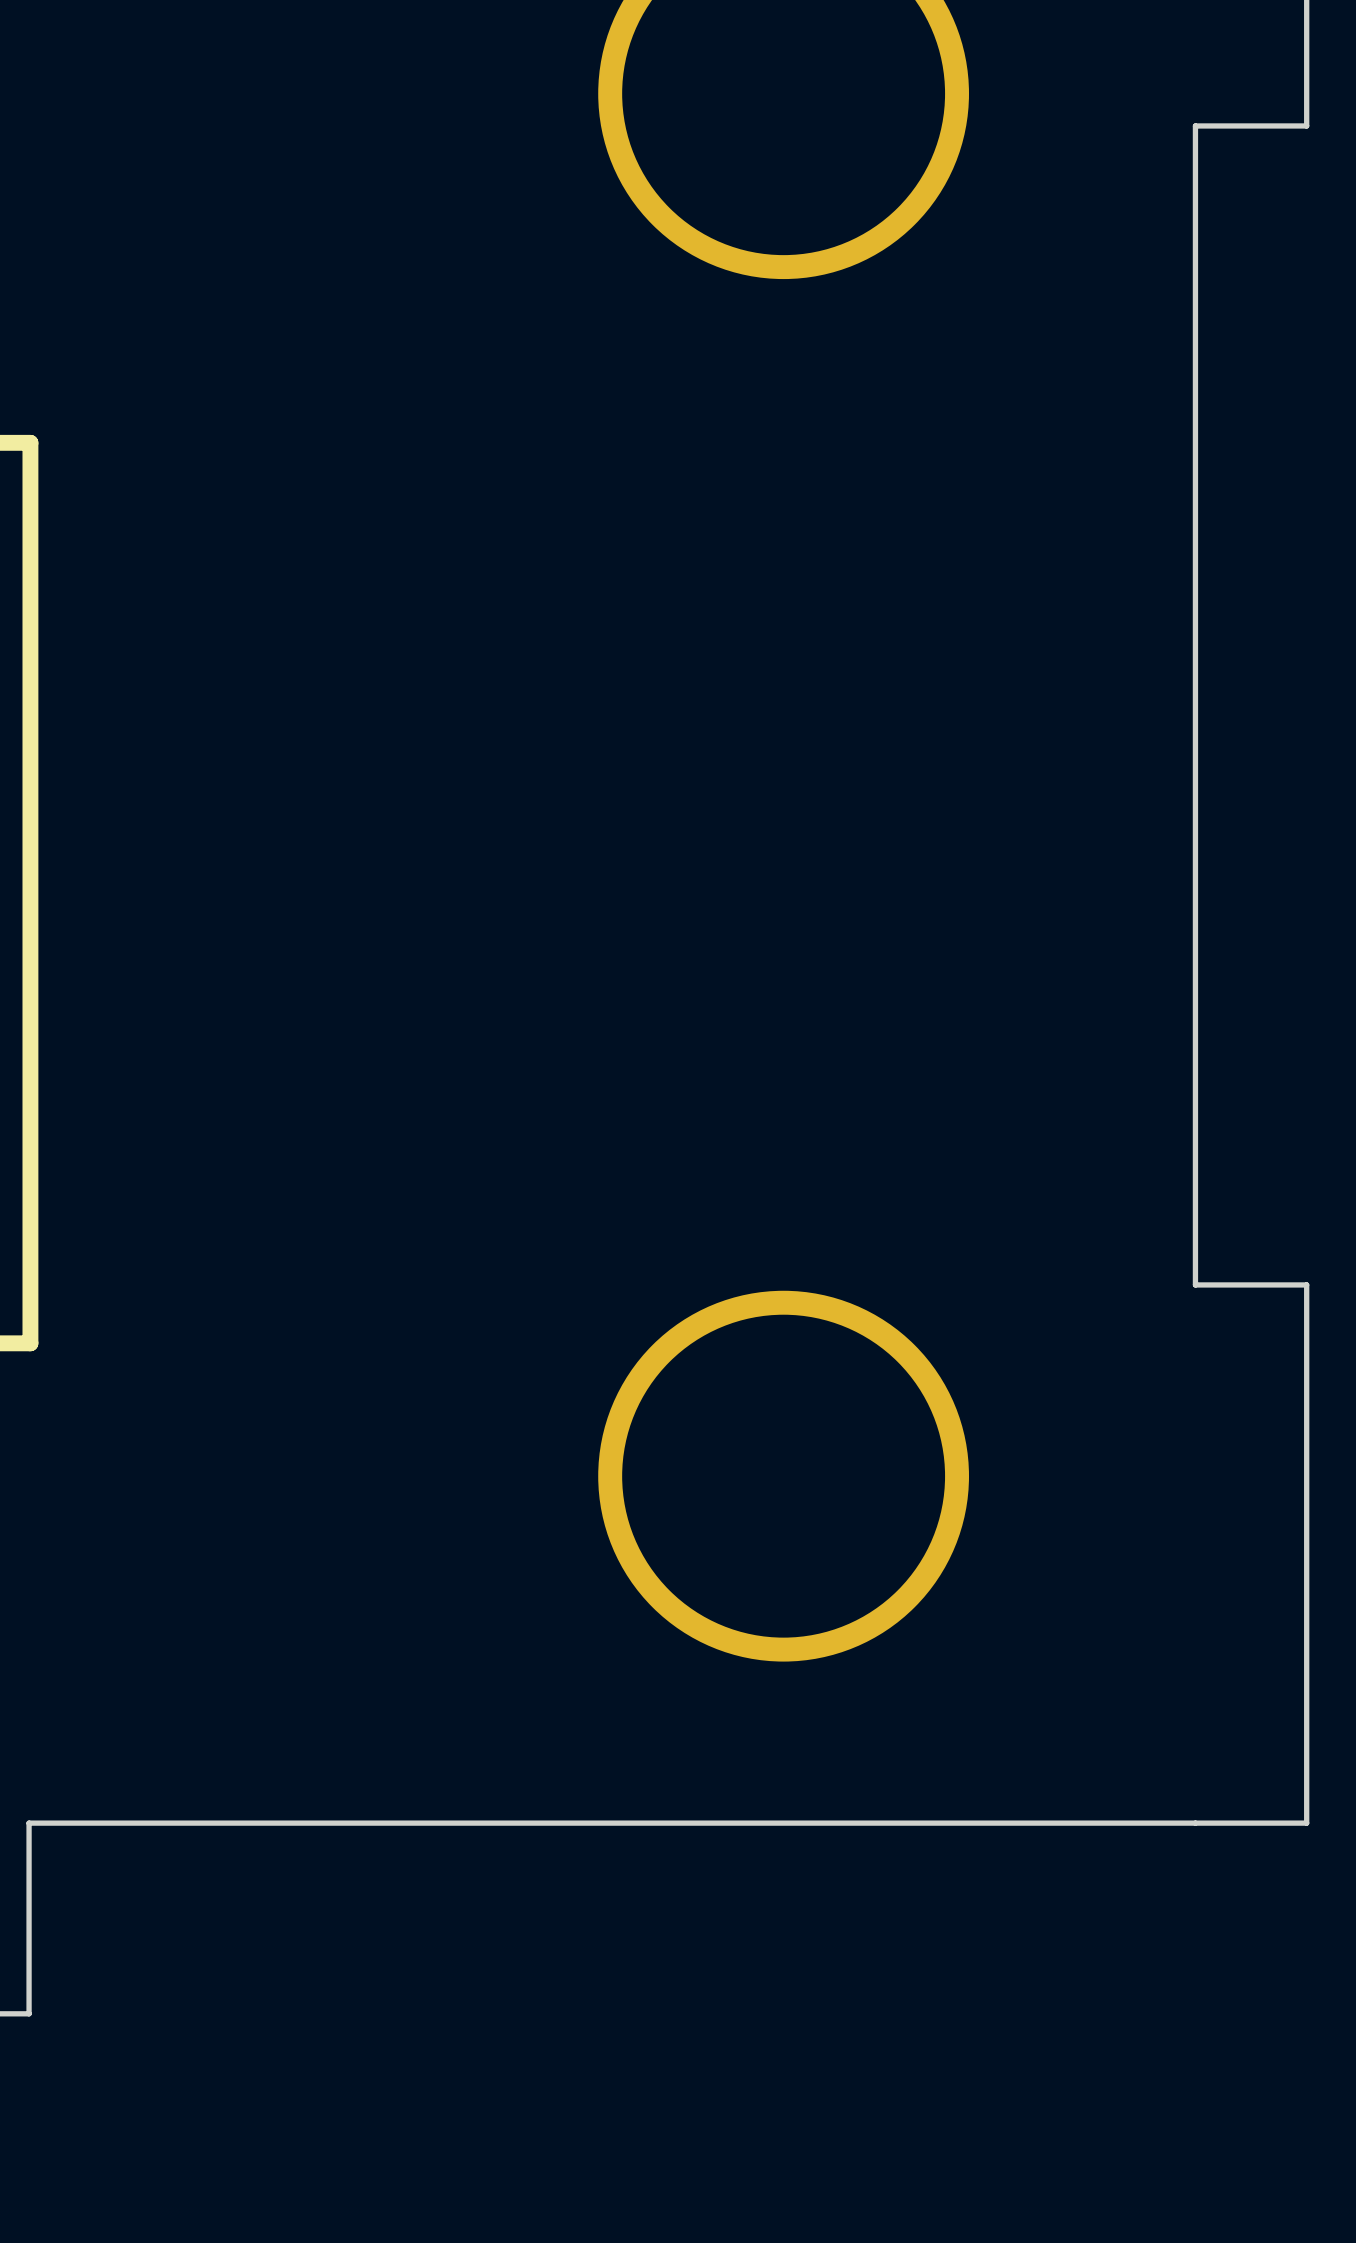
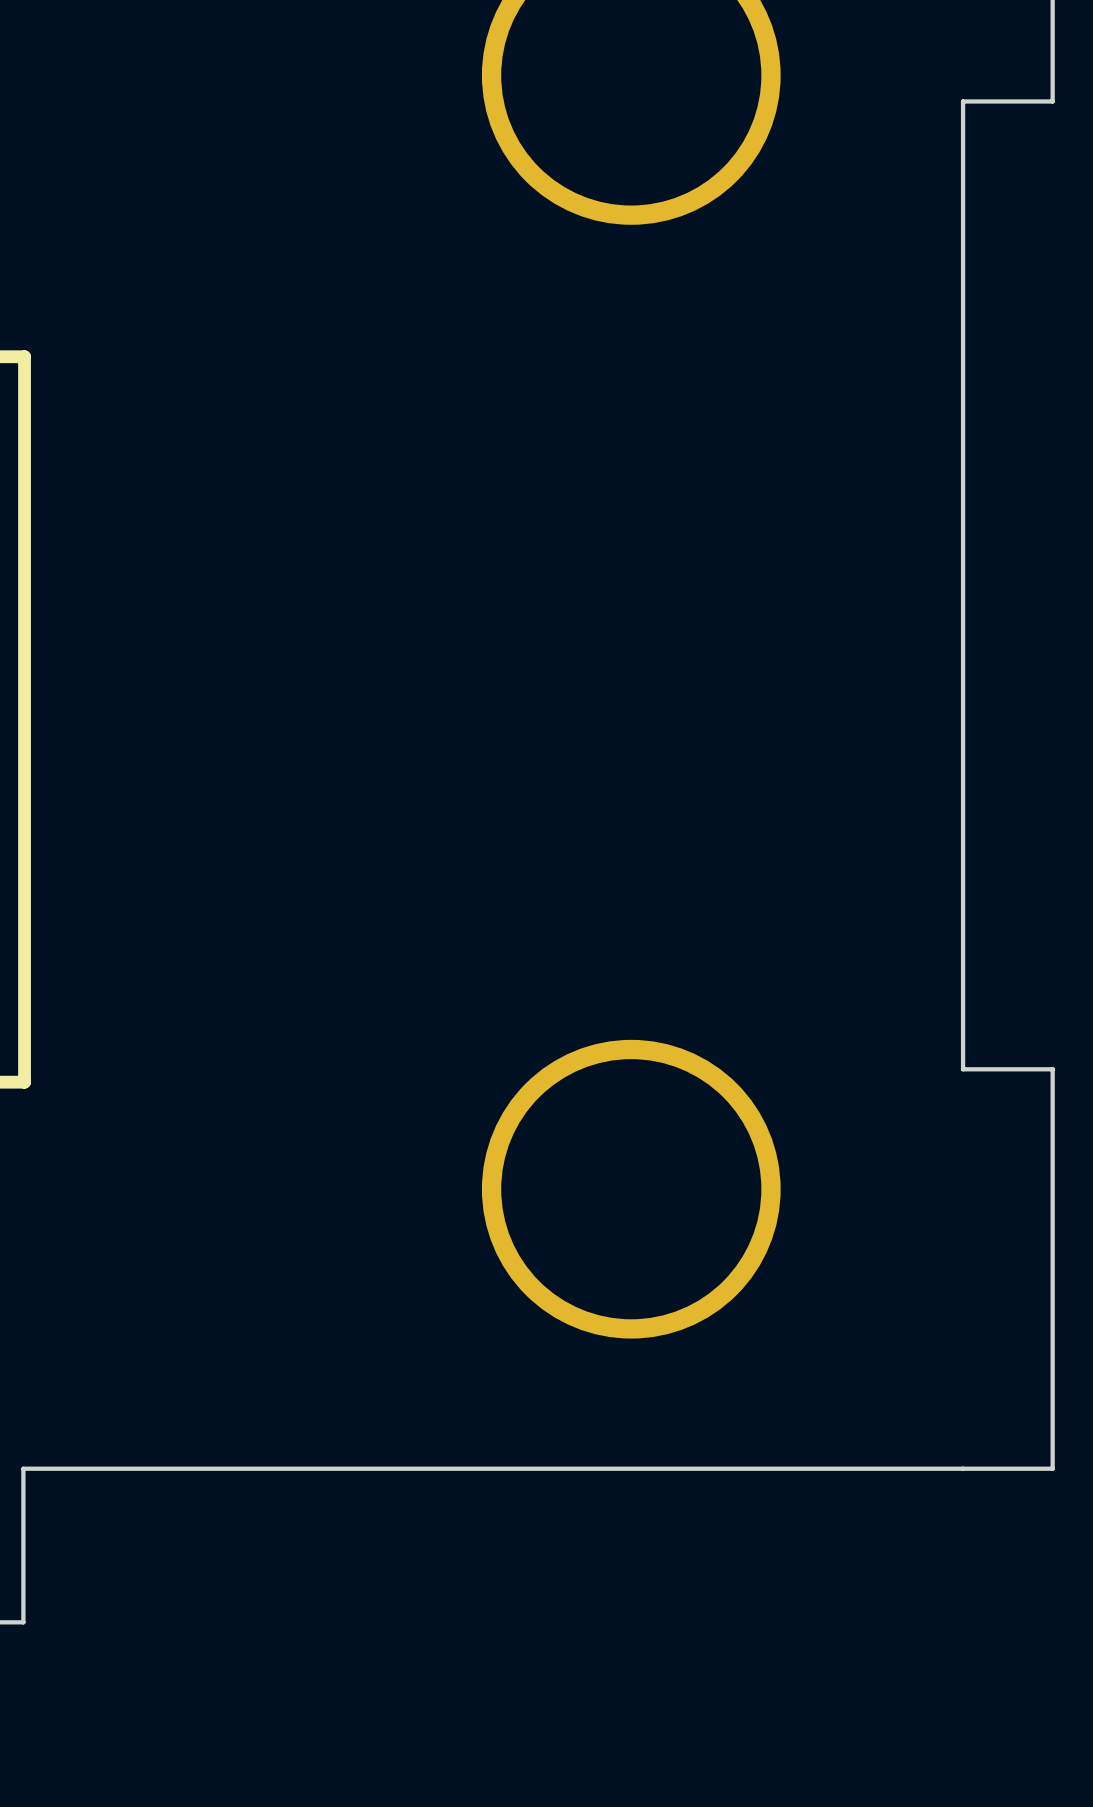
board edge: (1195, 1284) (1306, 1284) (1306, 1327) -> (963, 1035) (963, 1069) (1052, 1069)

